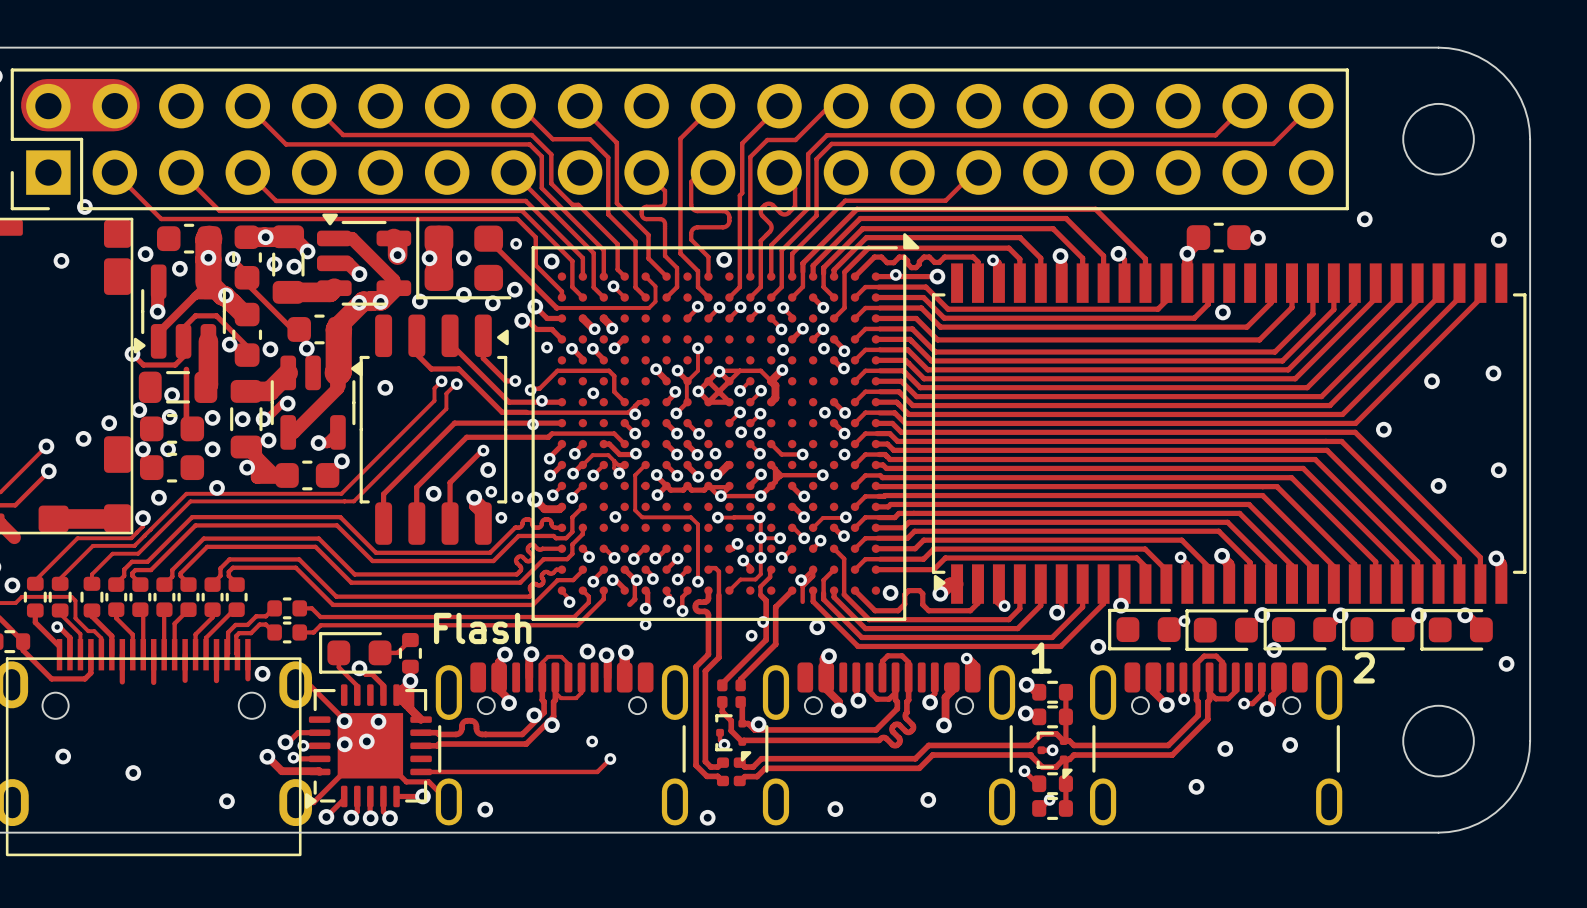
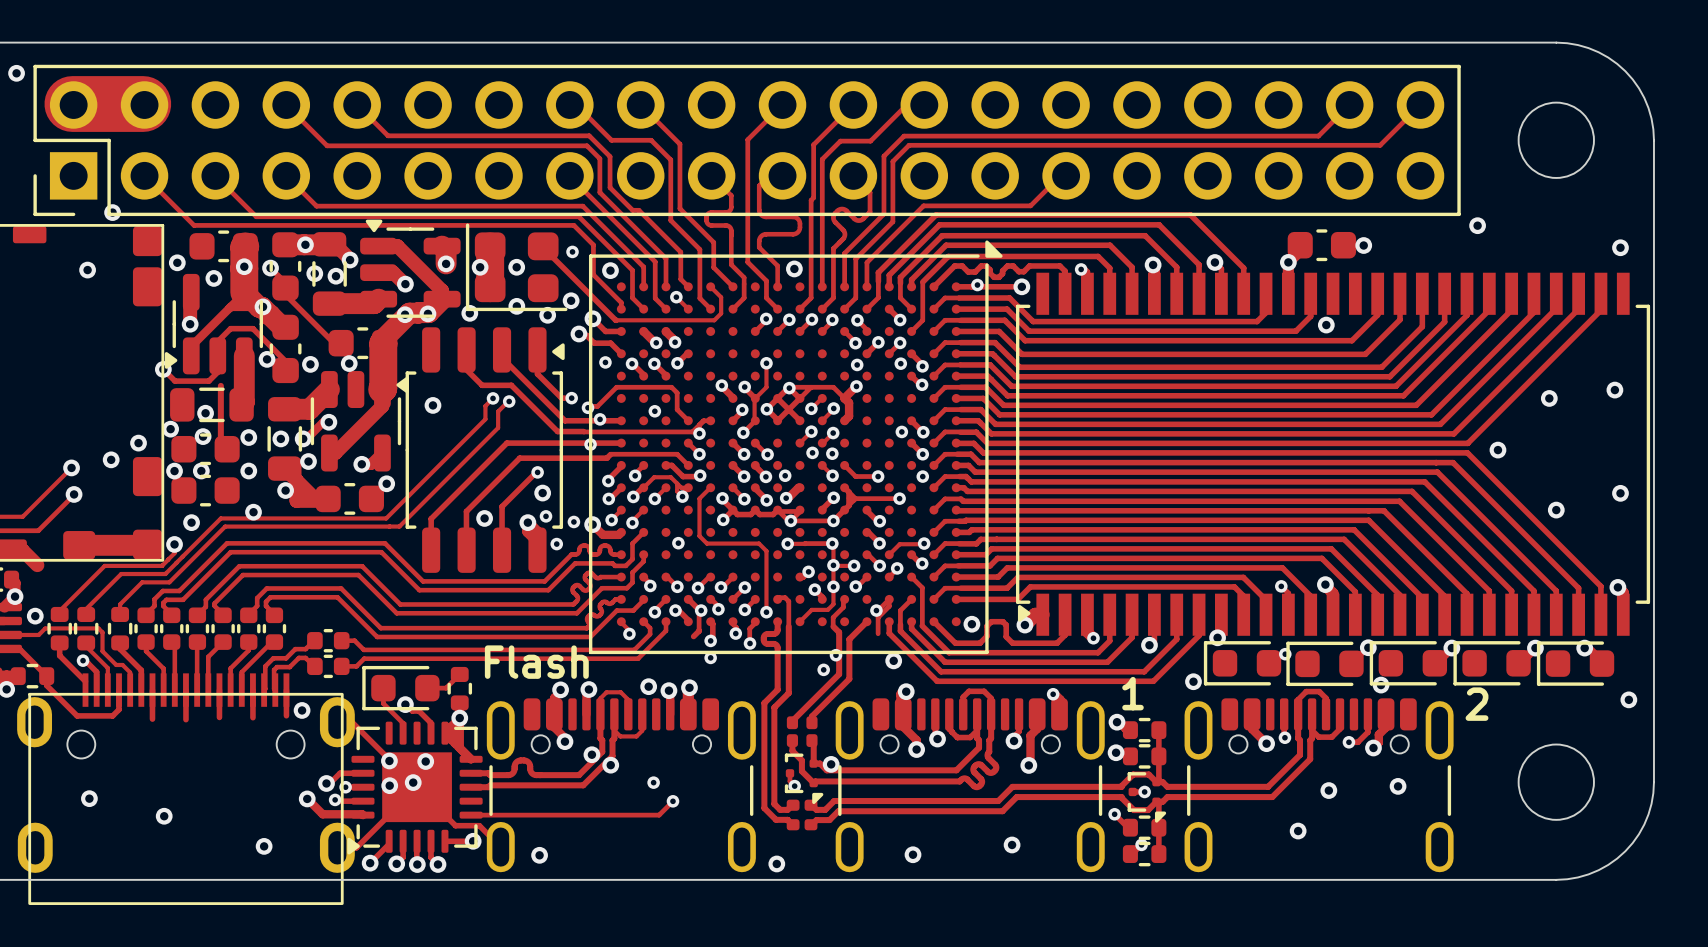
track: (708, 402) (729, 402) -> none

